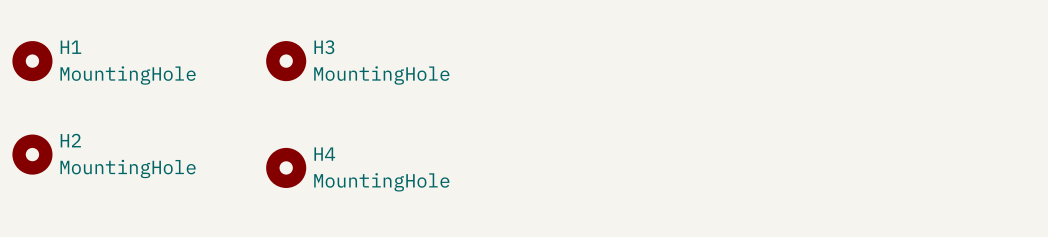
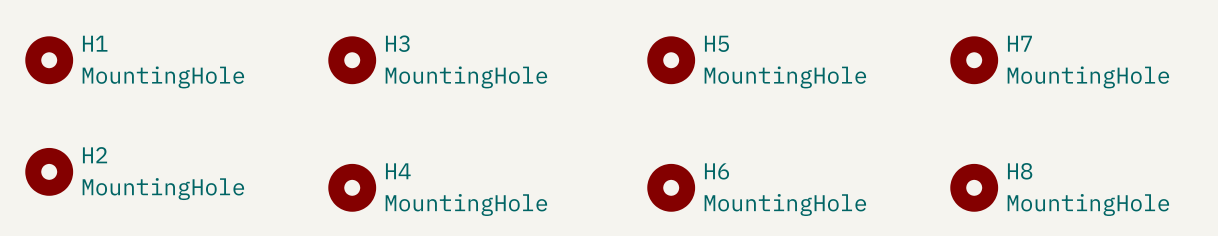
H5: none -> MountingHole (671, 60)
H7: none -> MountingHole (974, 60)
H6: none -> MountingHole (671, 187)
H8: none -> MountingHole (974, 187)

